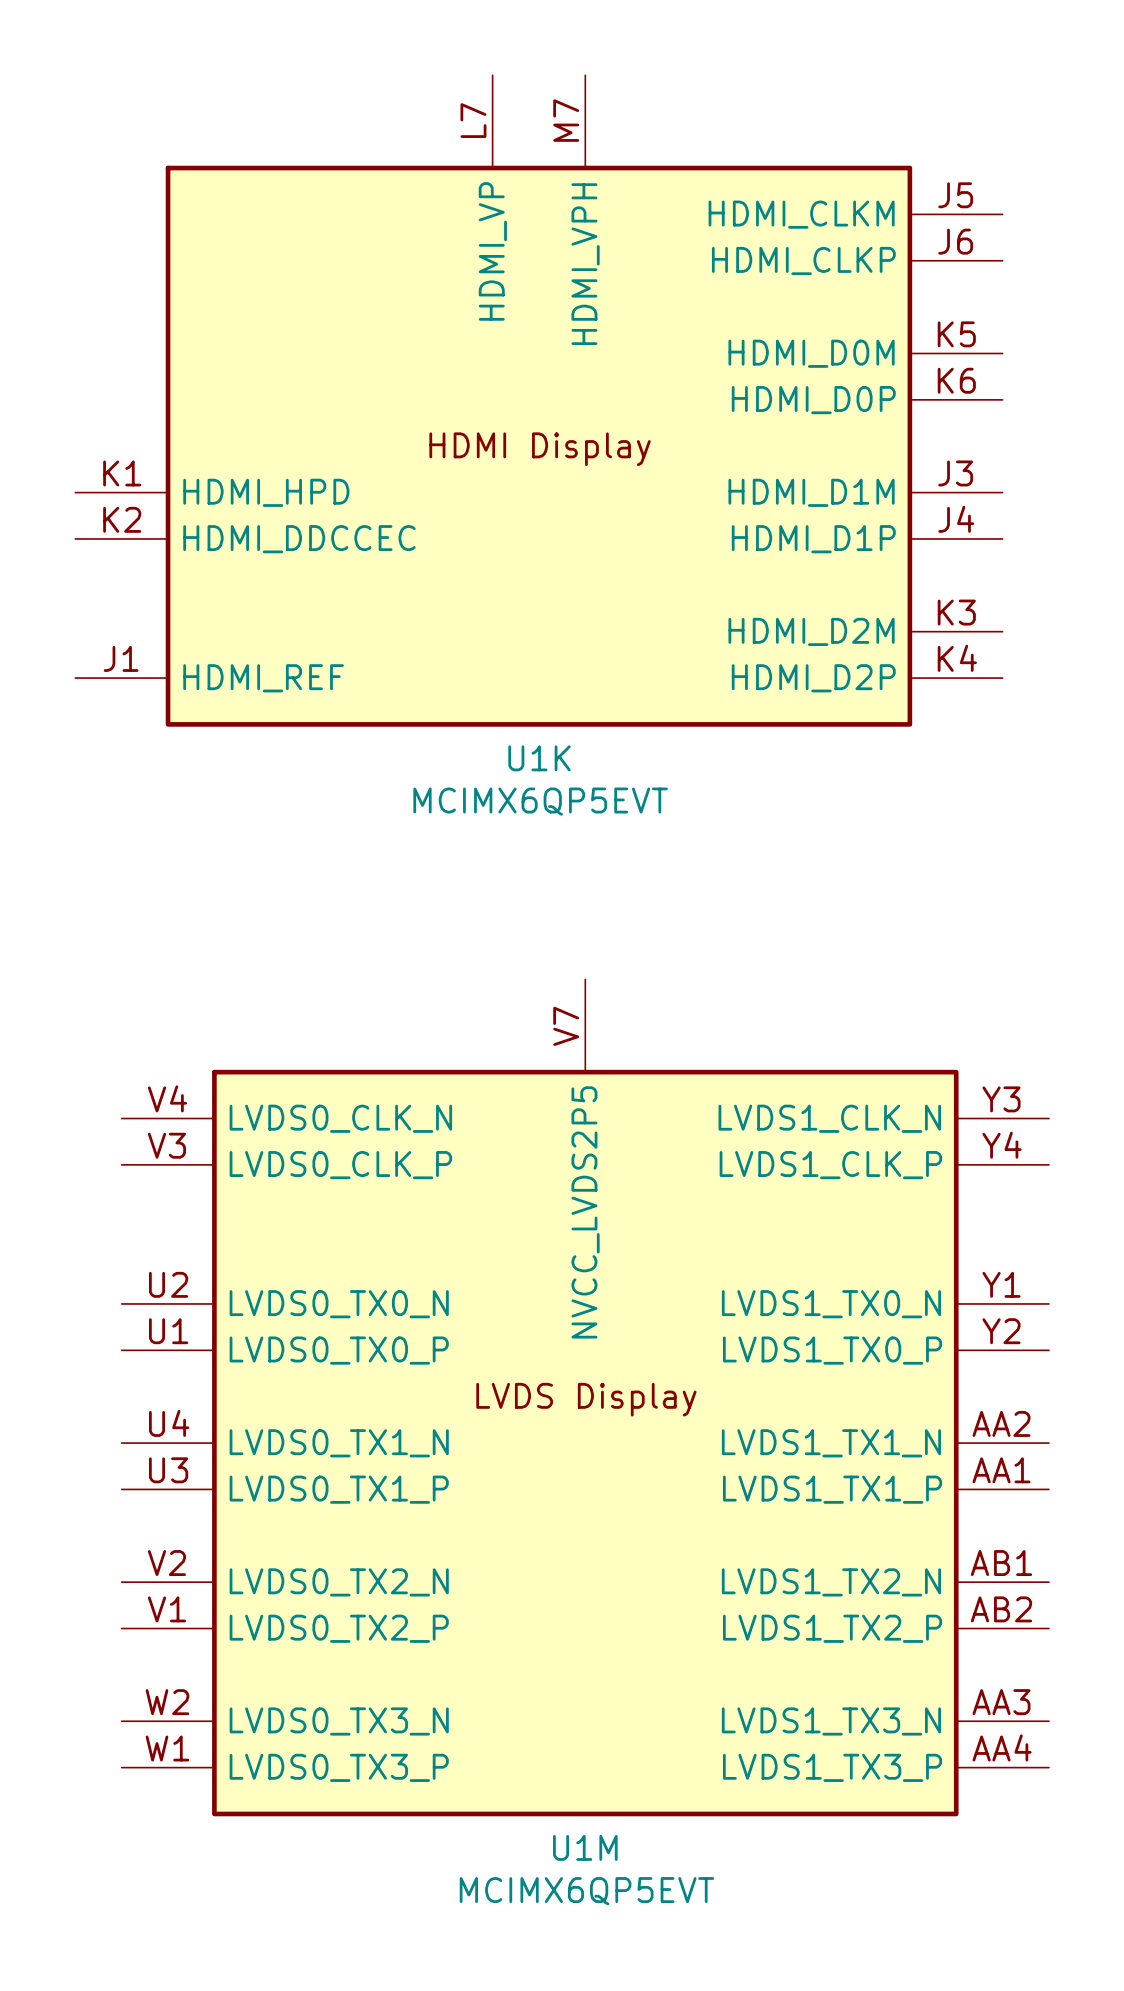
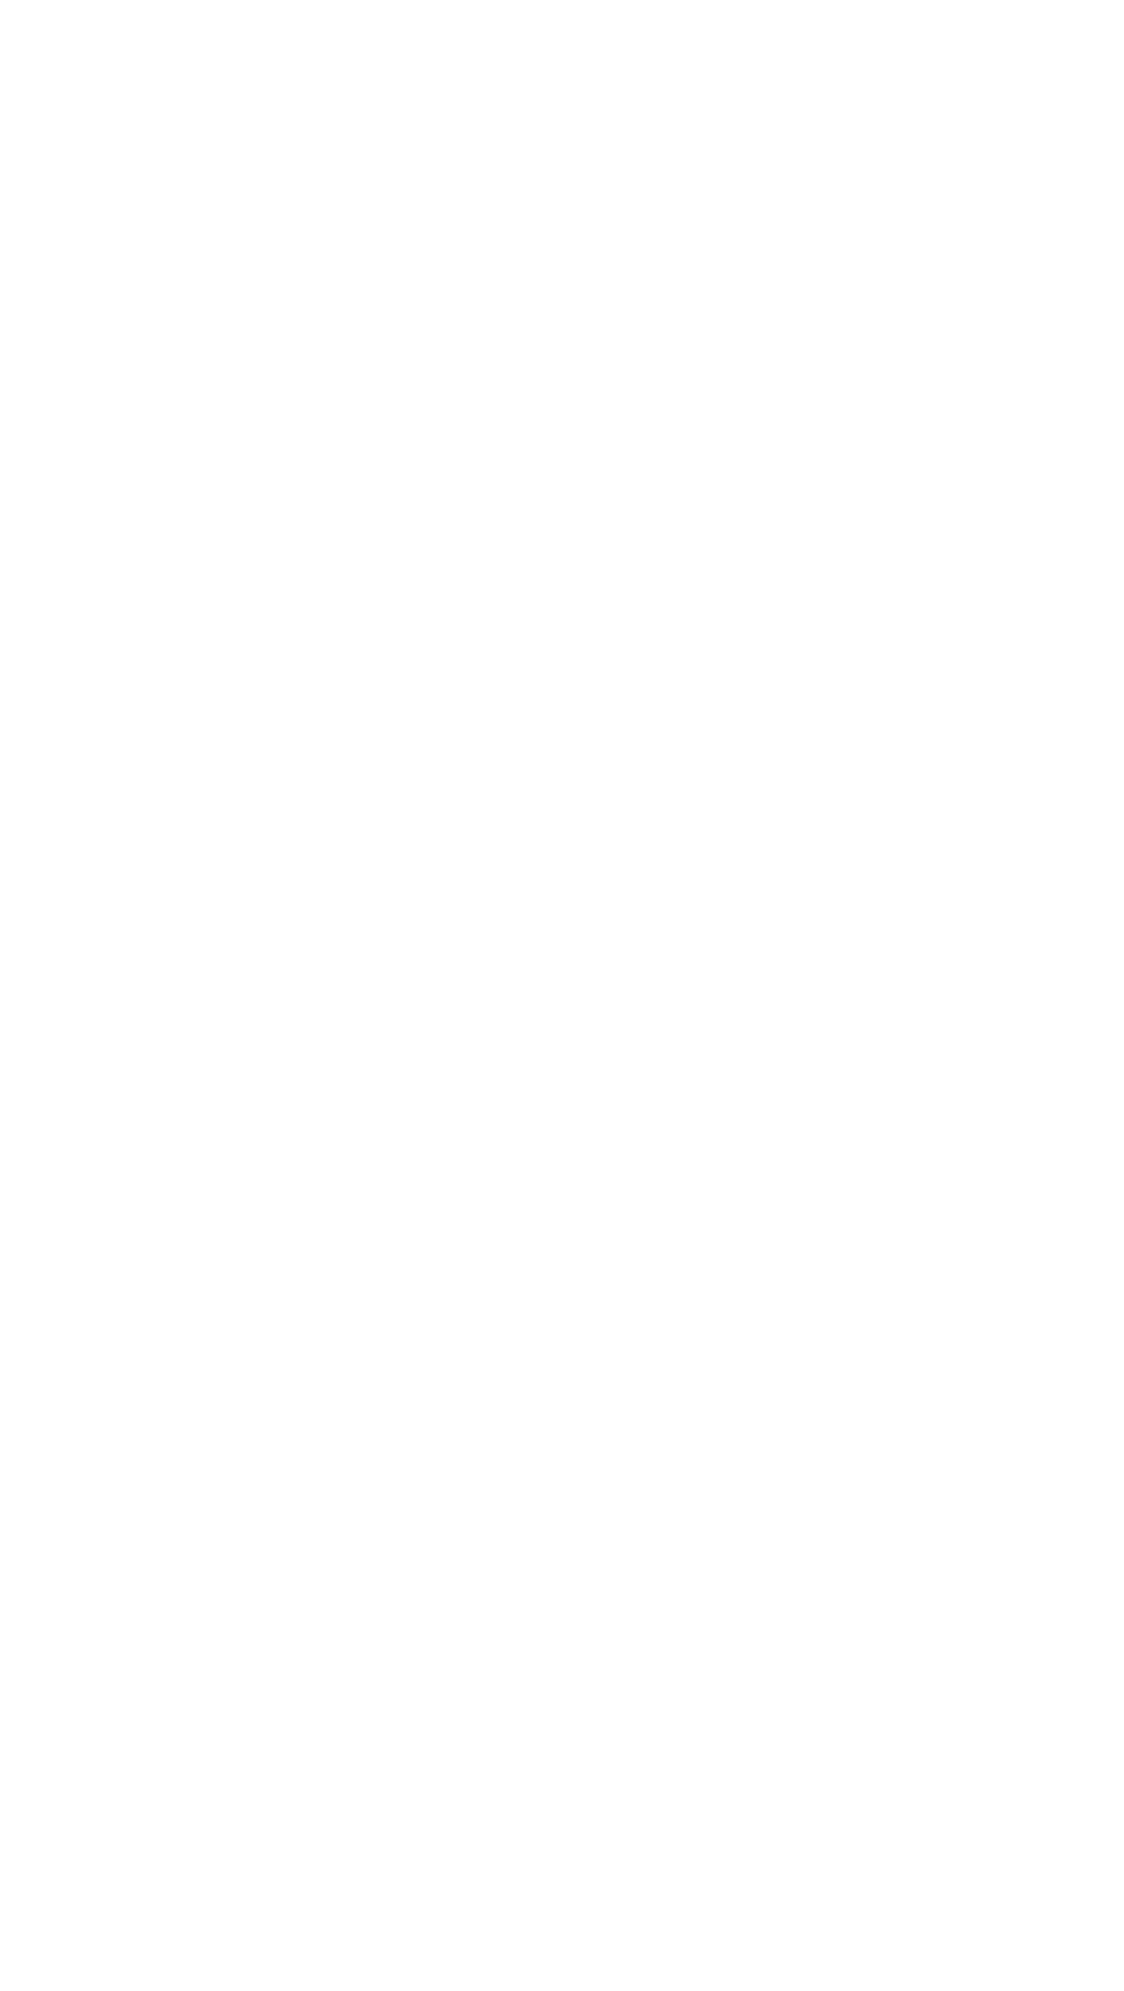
U1K: MCIMX6QP5EVT (538, 401) -> none
U1M: MCIMX6QP5EVT (585, 1397) -> none

